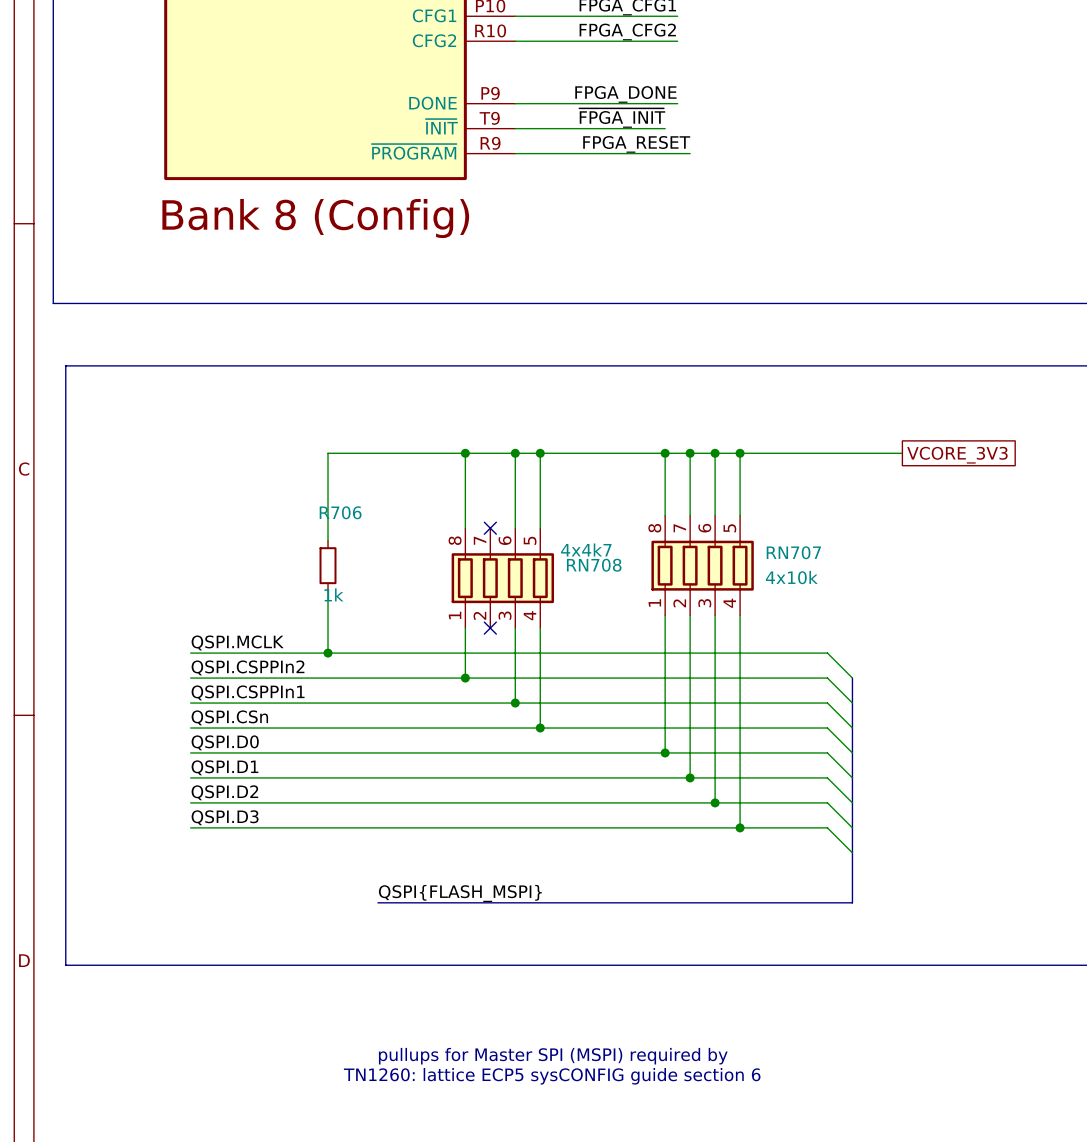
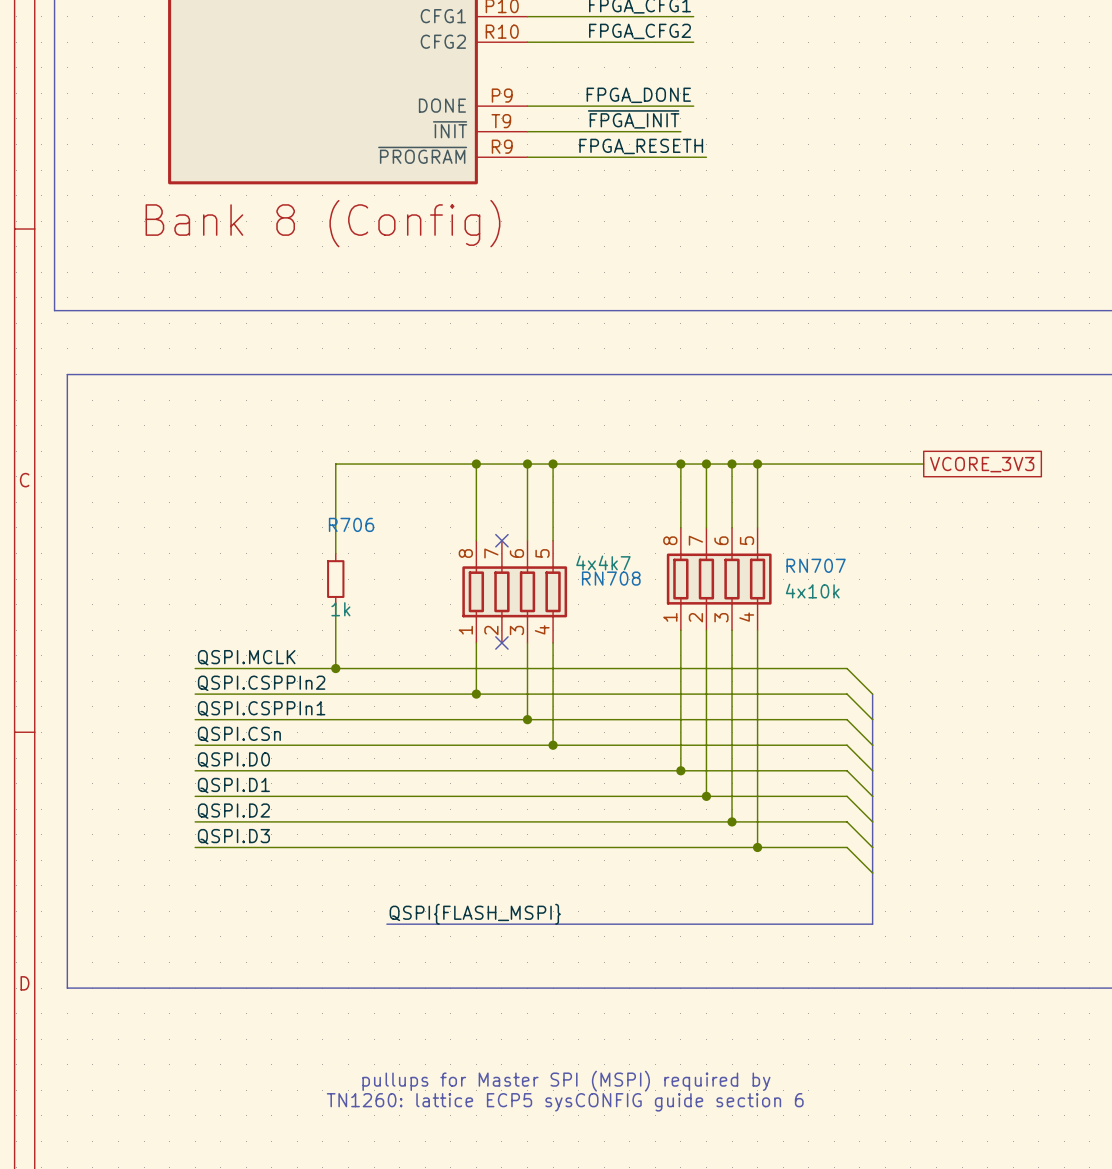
label: FPGA_RESET (636, 144) -> FPGA_RESETH (641, 146)

